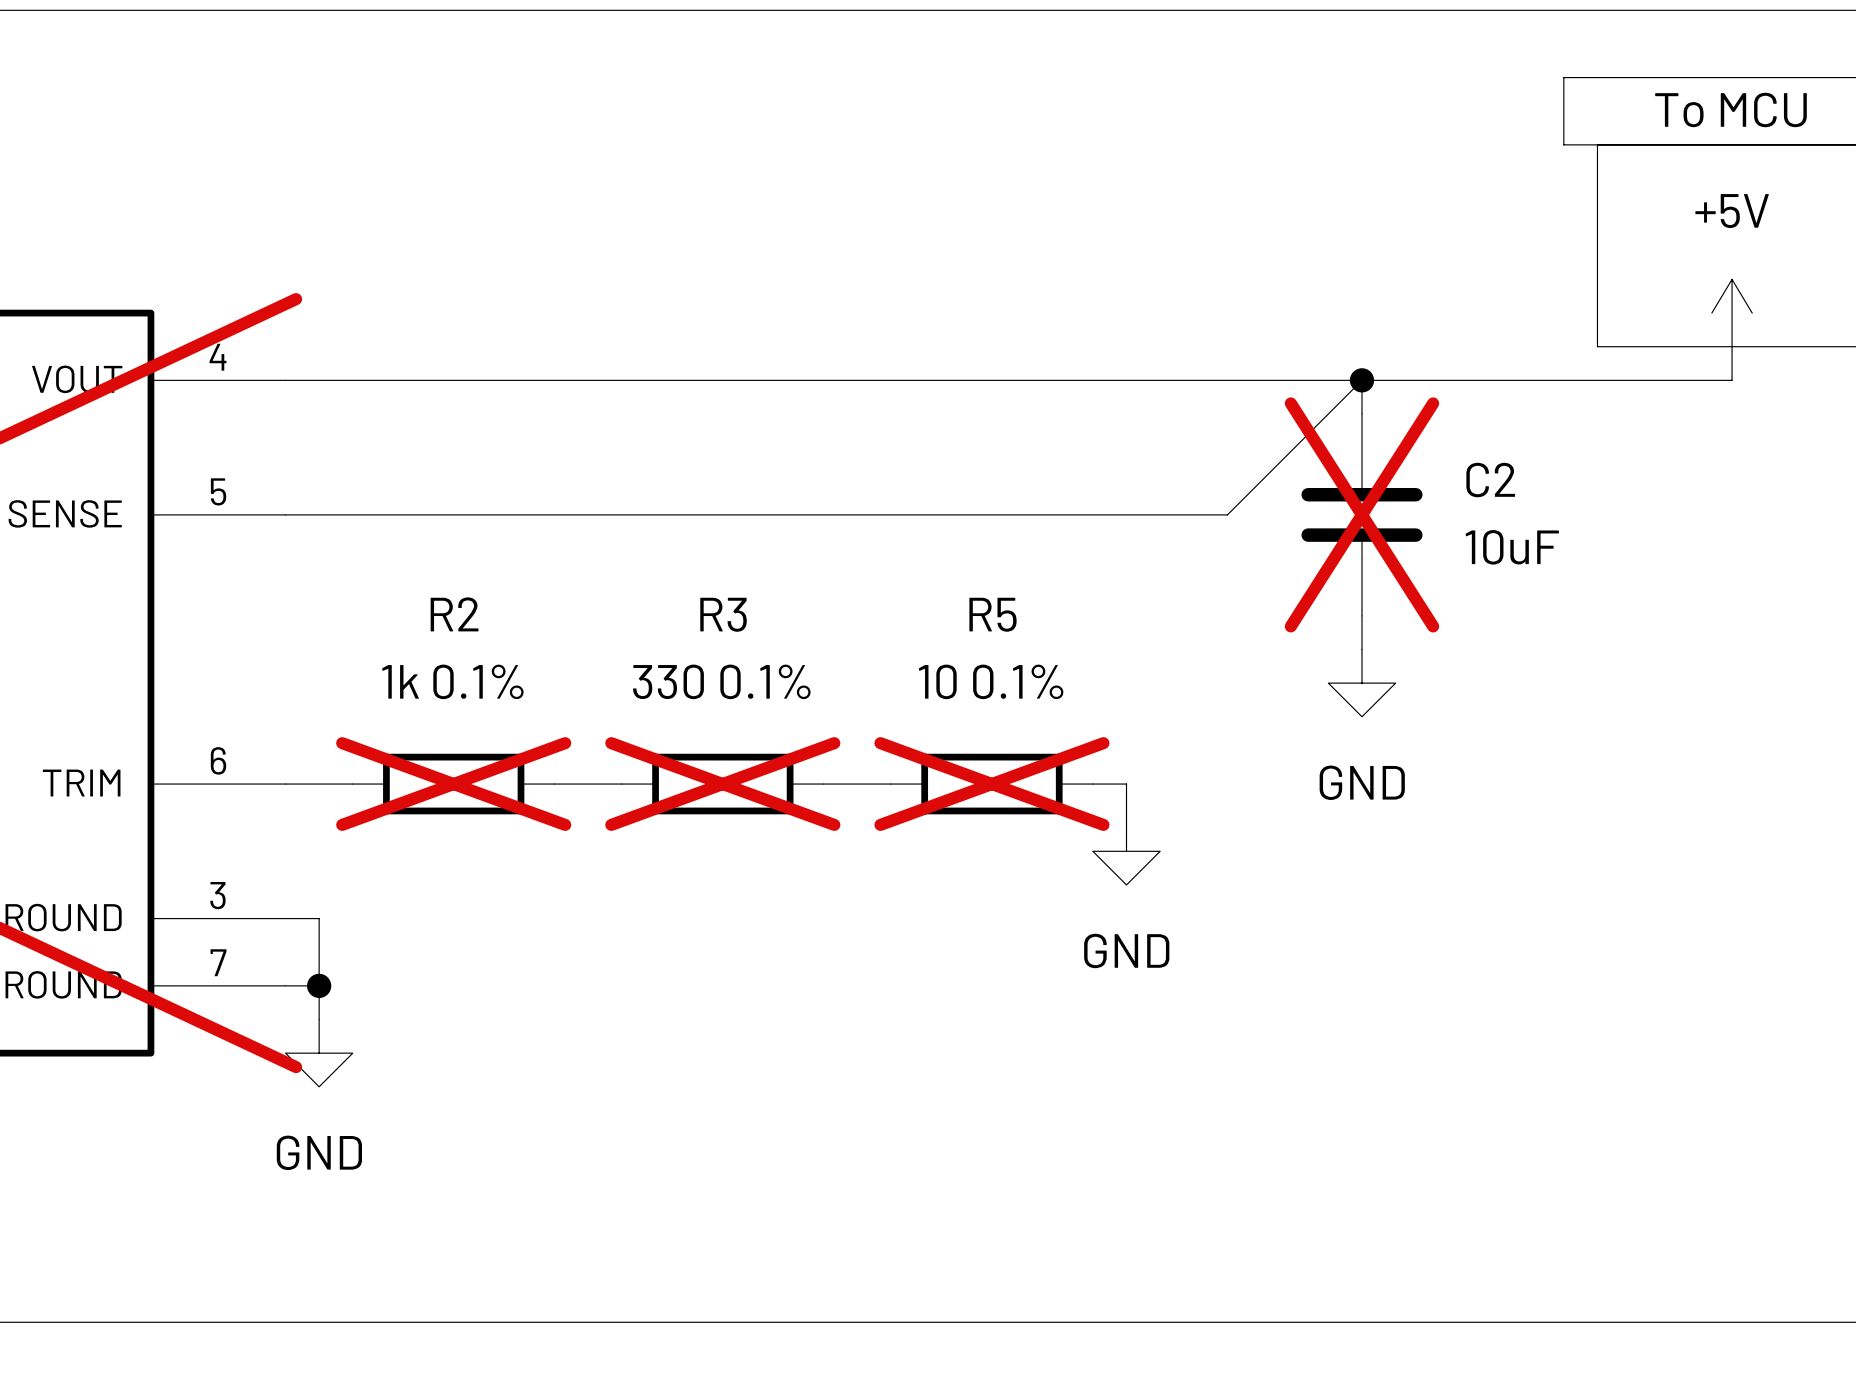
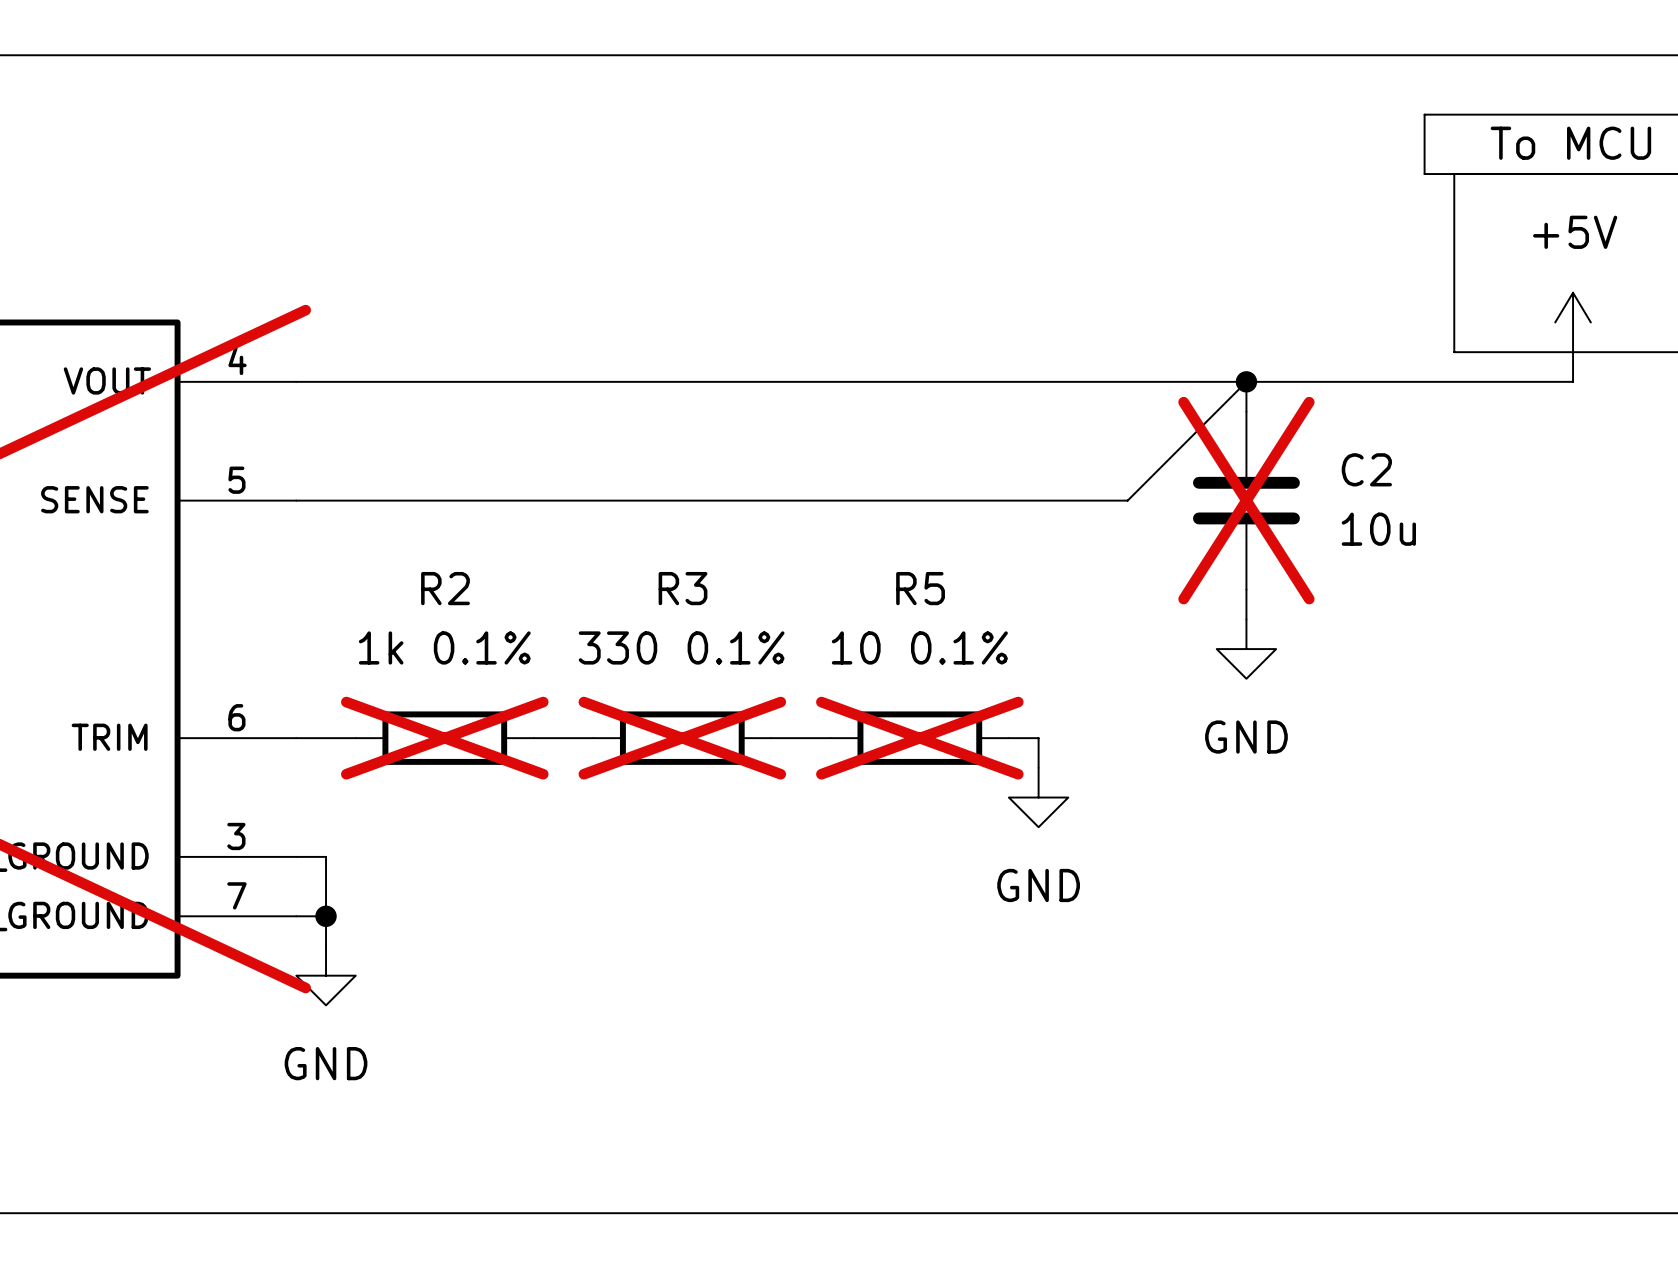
C2 value: 10uF (1512, 547) -> 10u (1378, 529)

